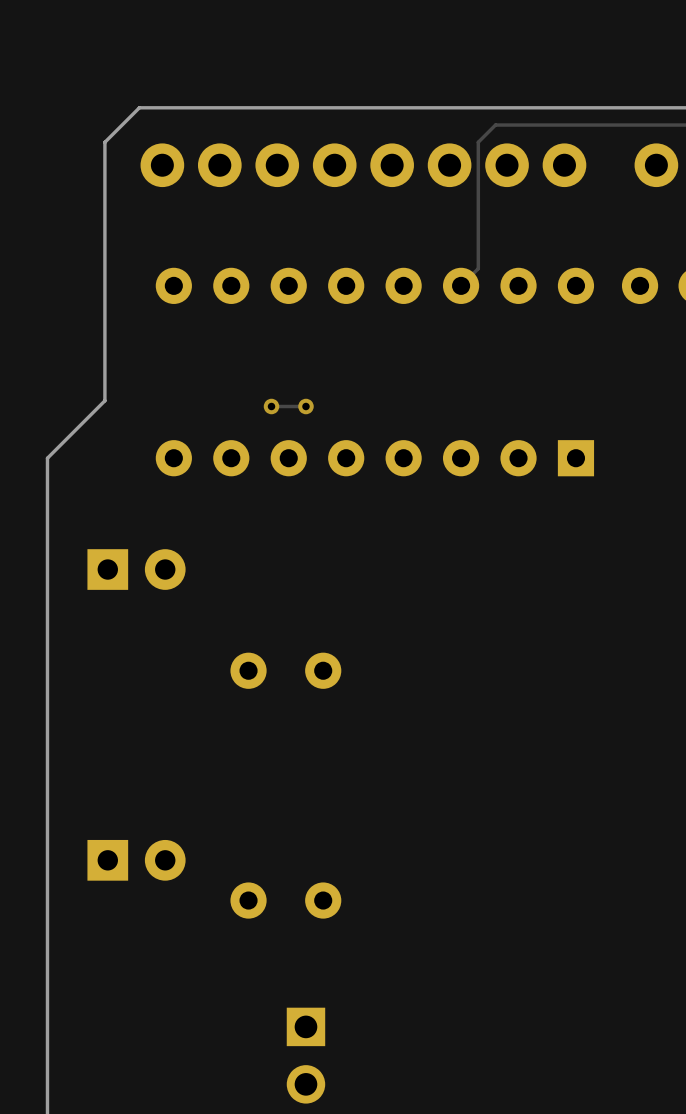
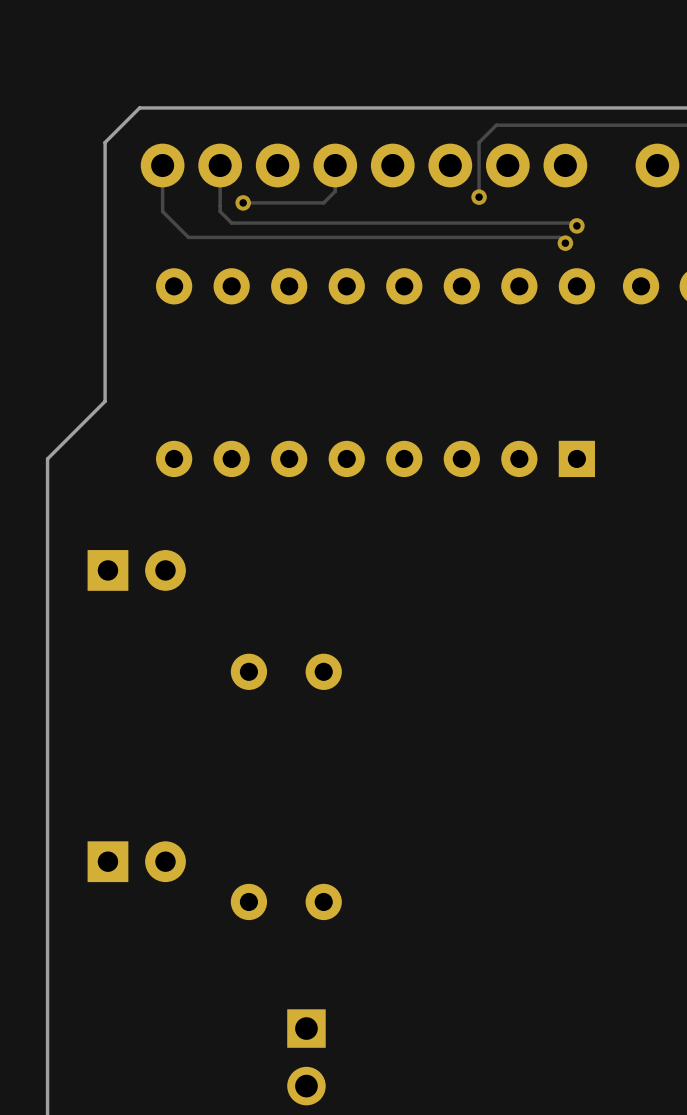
track: none -> (162, 165) (162, 211) (188, 237) (559, 237) (565, 243)
track: none -> (220, 165) (220, 211) (231, 223) (574, 223) (576, 225)
track: none -> (335, 165) (335, 191) (323, 202) (243, 202)
track: (478, 196) (478, 268) (461, 285) -> none
via: none -> (479, 197)
via: none -> (243, 202)
via: none -> (576, 225)
via: none -> (565, 243)
via: (271, 406) -> none
track: (305, 406) (271, 406) -> none
via: (305, 406) -> none

